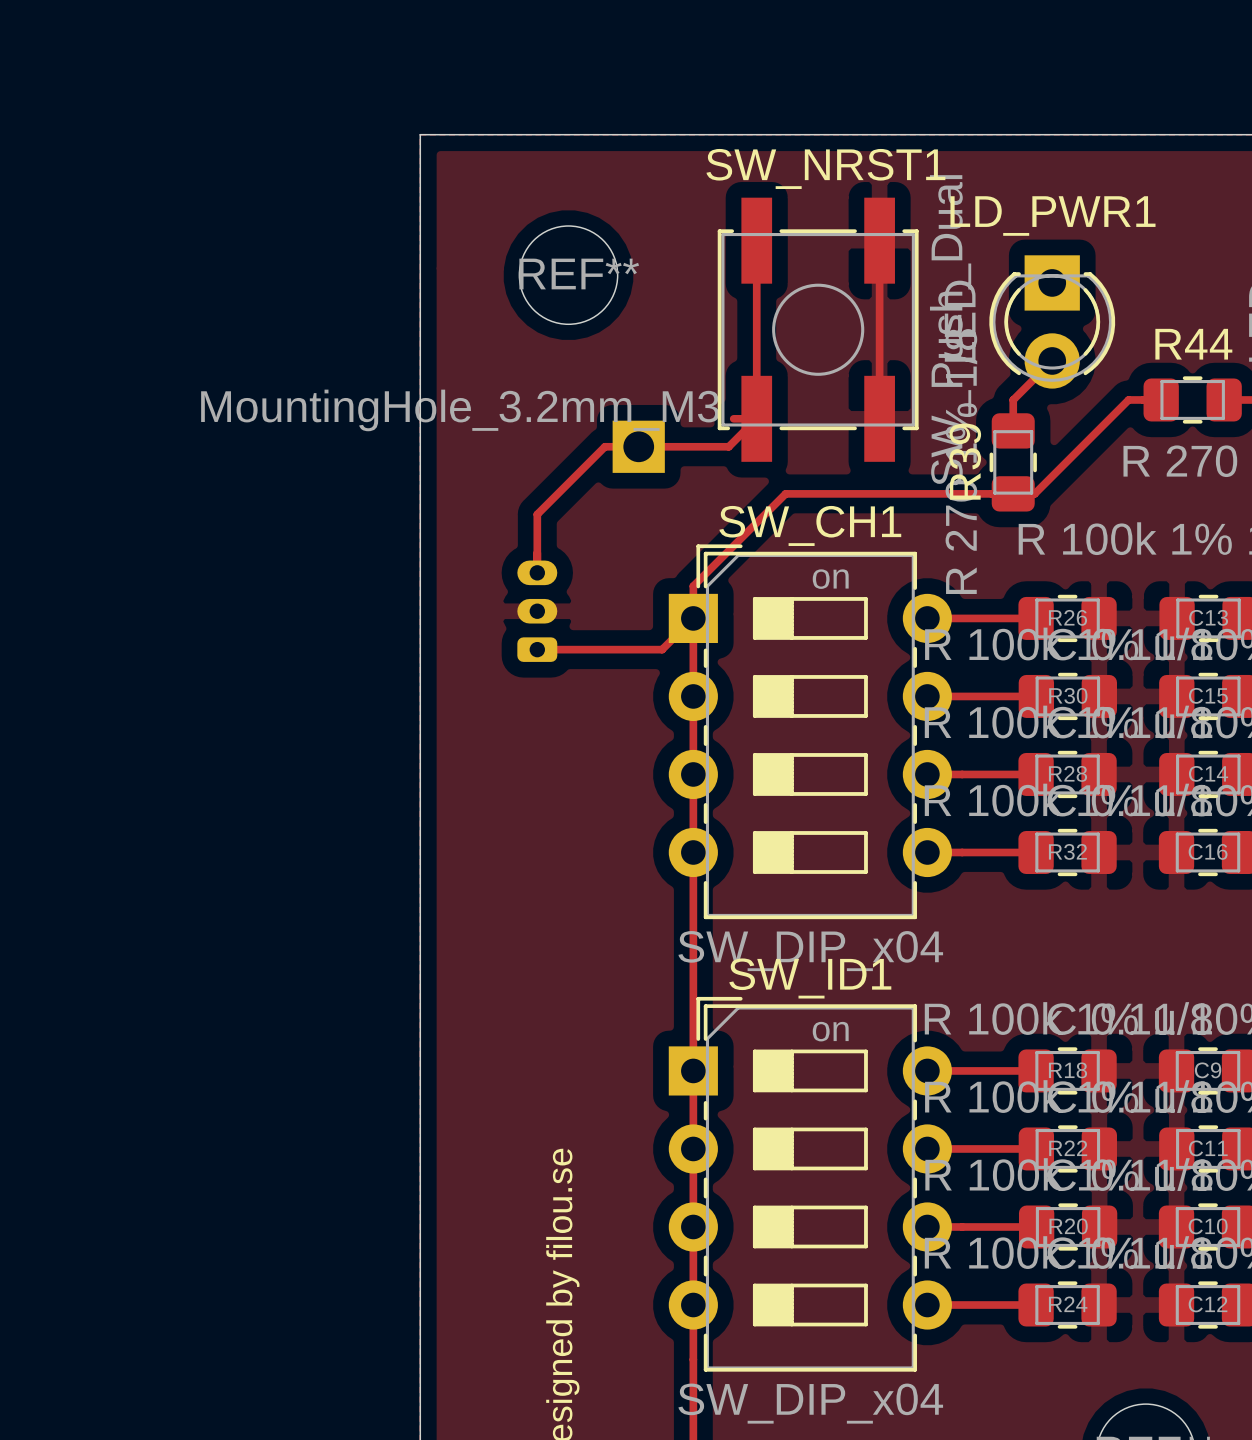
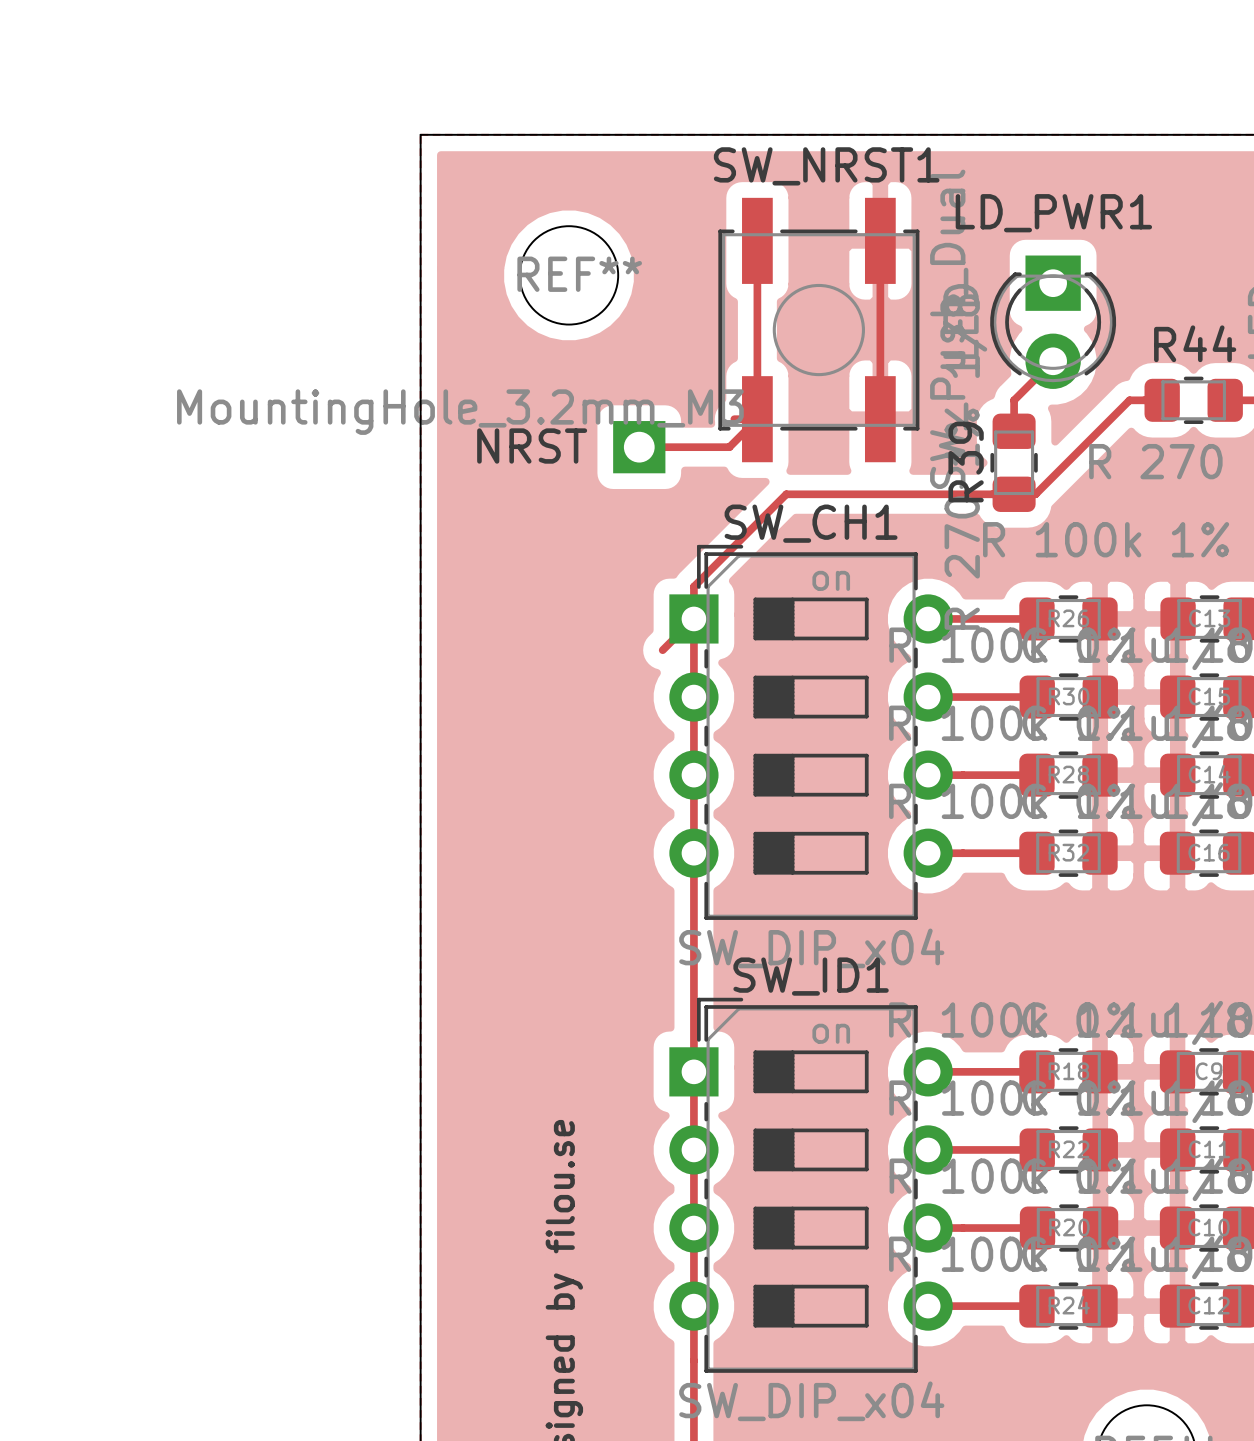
text: none -> NRST (532, 446)
track: (638, 446) (604, 446) (537, 514) (537, 572) -> none
part: (537, 611) -> none
track: (537, 649) (662, 649) -> none

